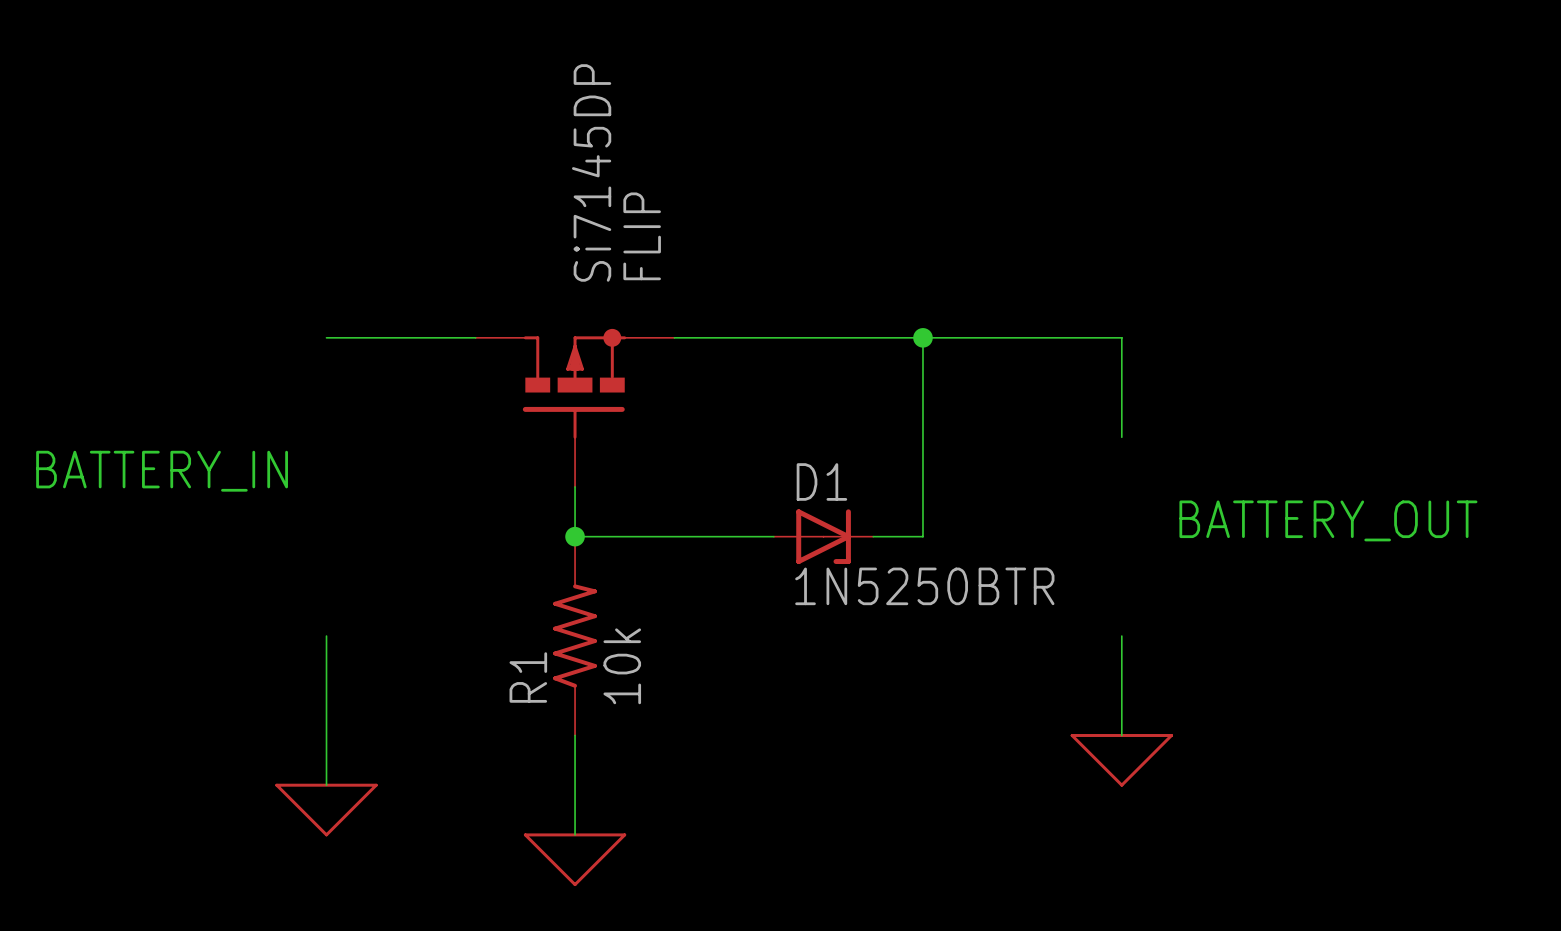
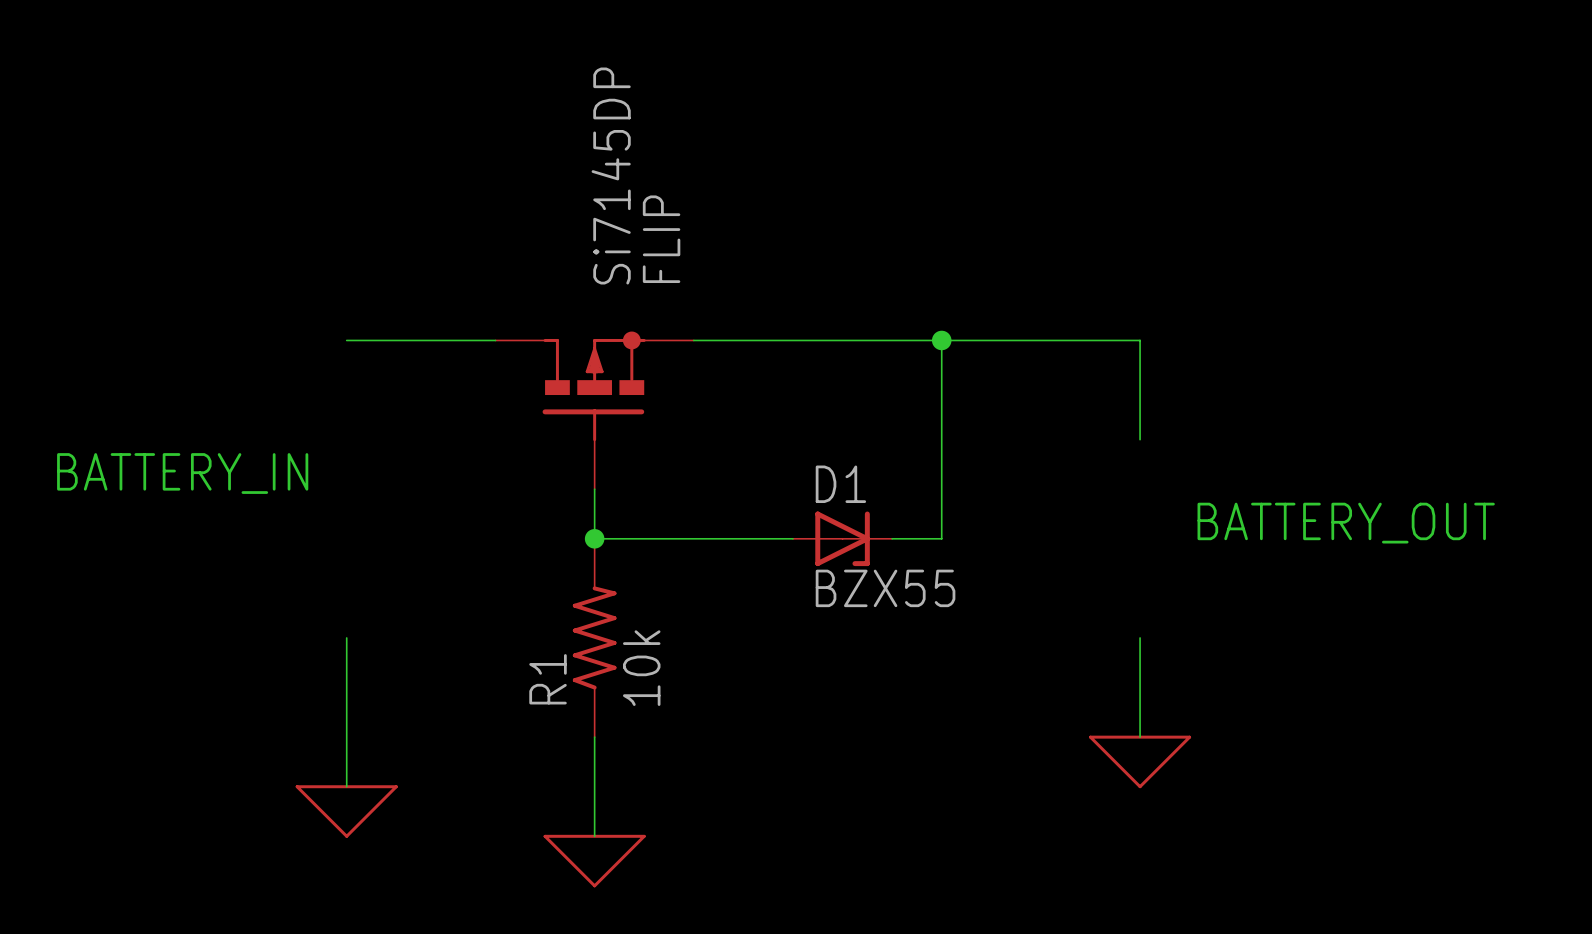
D1 value: 1N5250BTR (924, 586) -> BZX55 (885, 588)

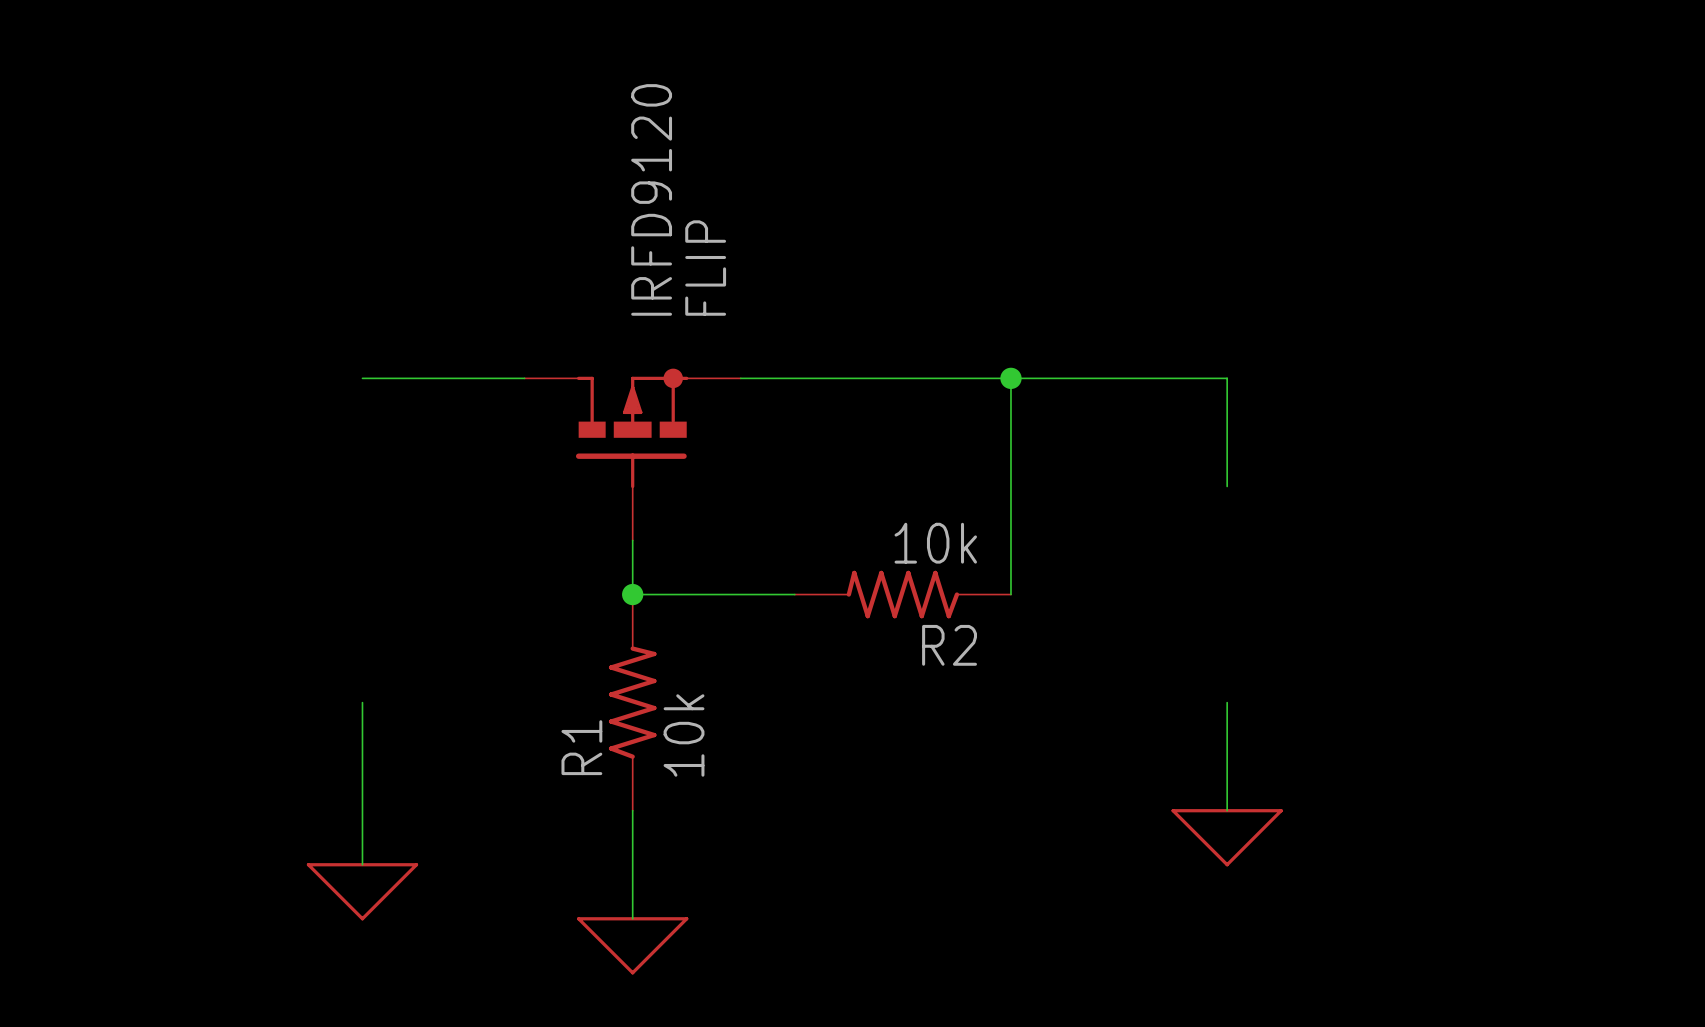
FLIP value: Si7145DP (611, 176) -> IRFD9120 (651, 199)
text: BATTERY_IN (182, 473) -> none
text: BATTERY_OUT (1346, 523) -> none
D1: BZX55 (842, 538) -> none
R2: none -> 10k (902, 594)

